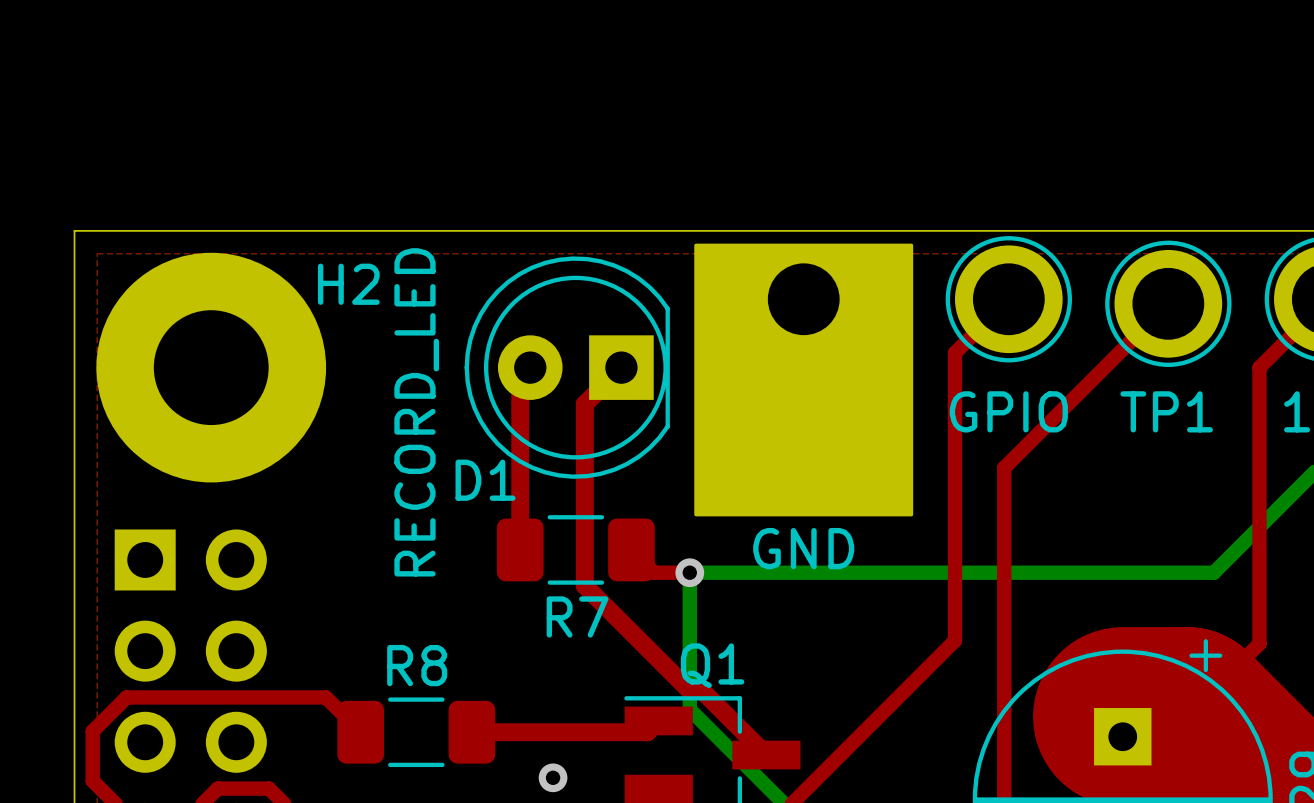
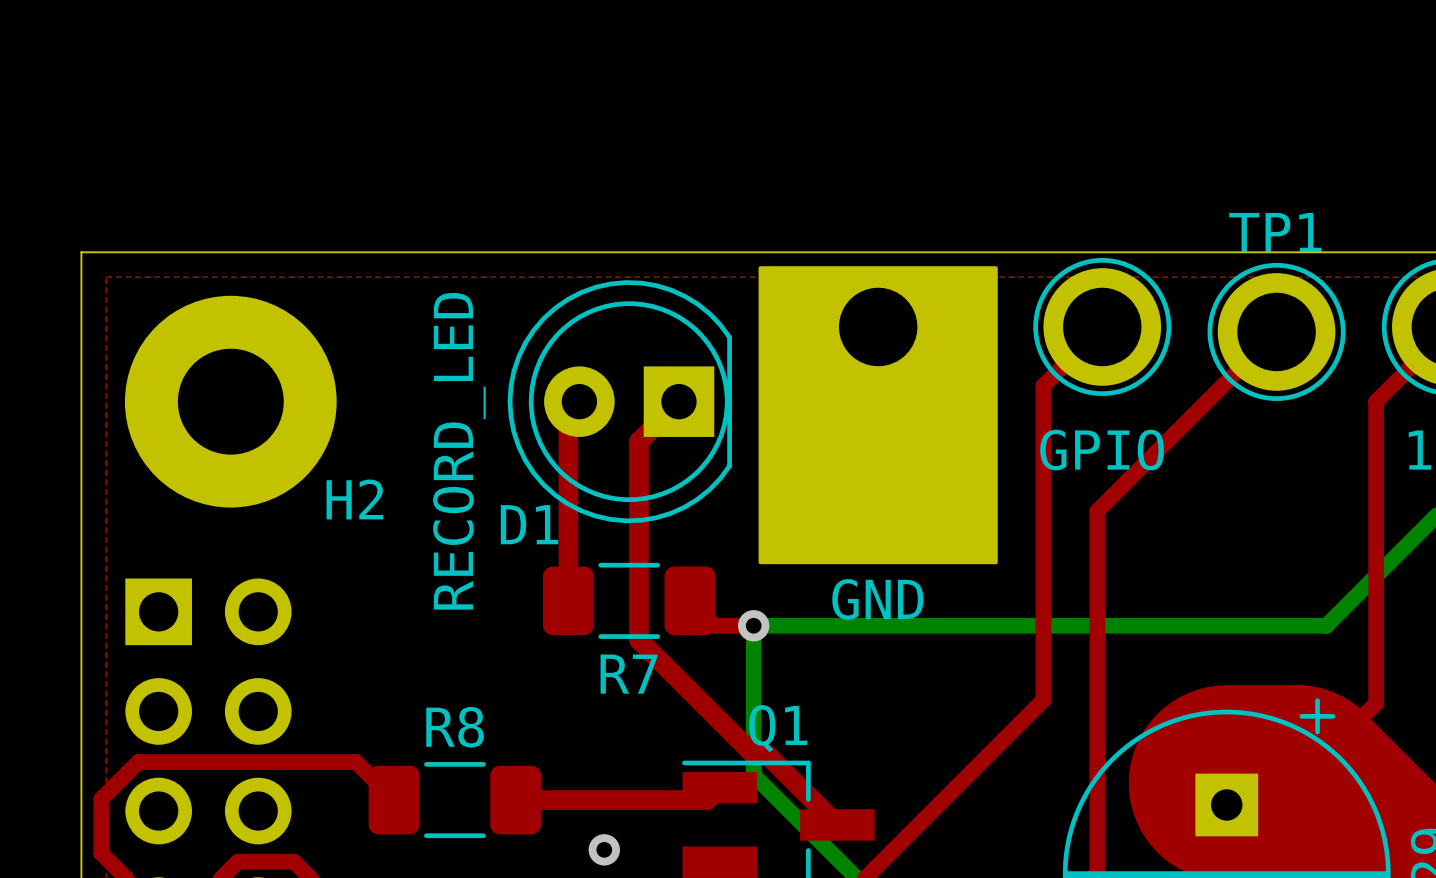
H2 footprint: [96, 252, 327, 483] -> [124, 295, 337, 508]
H2 name position: H2 (348, 284) -> H2 (354, 499)
TP1 name position: TP1 (1166, 411) -> TP1 (1275, 232)

